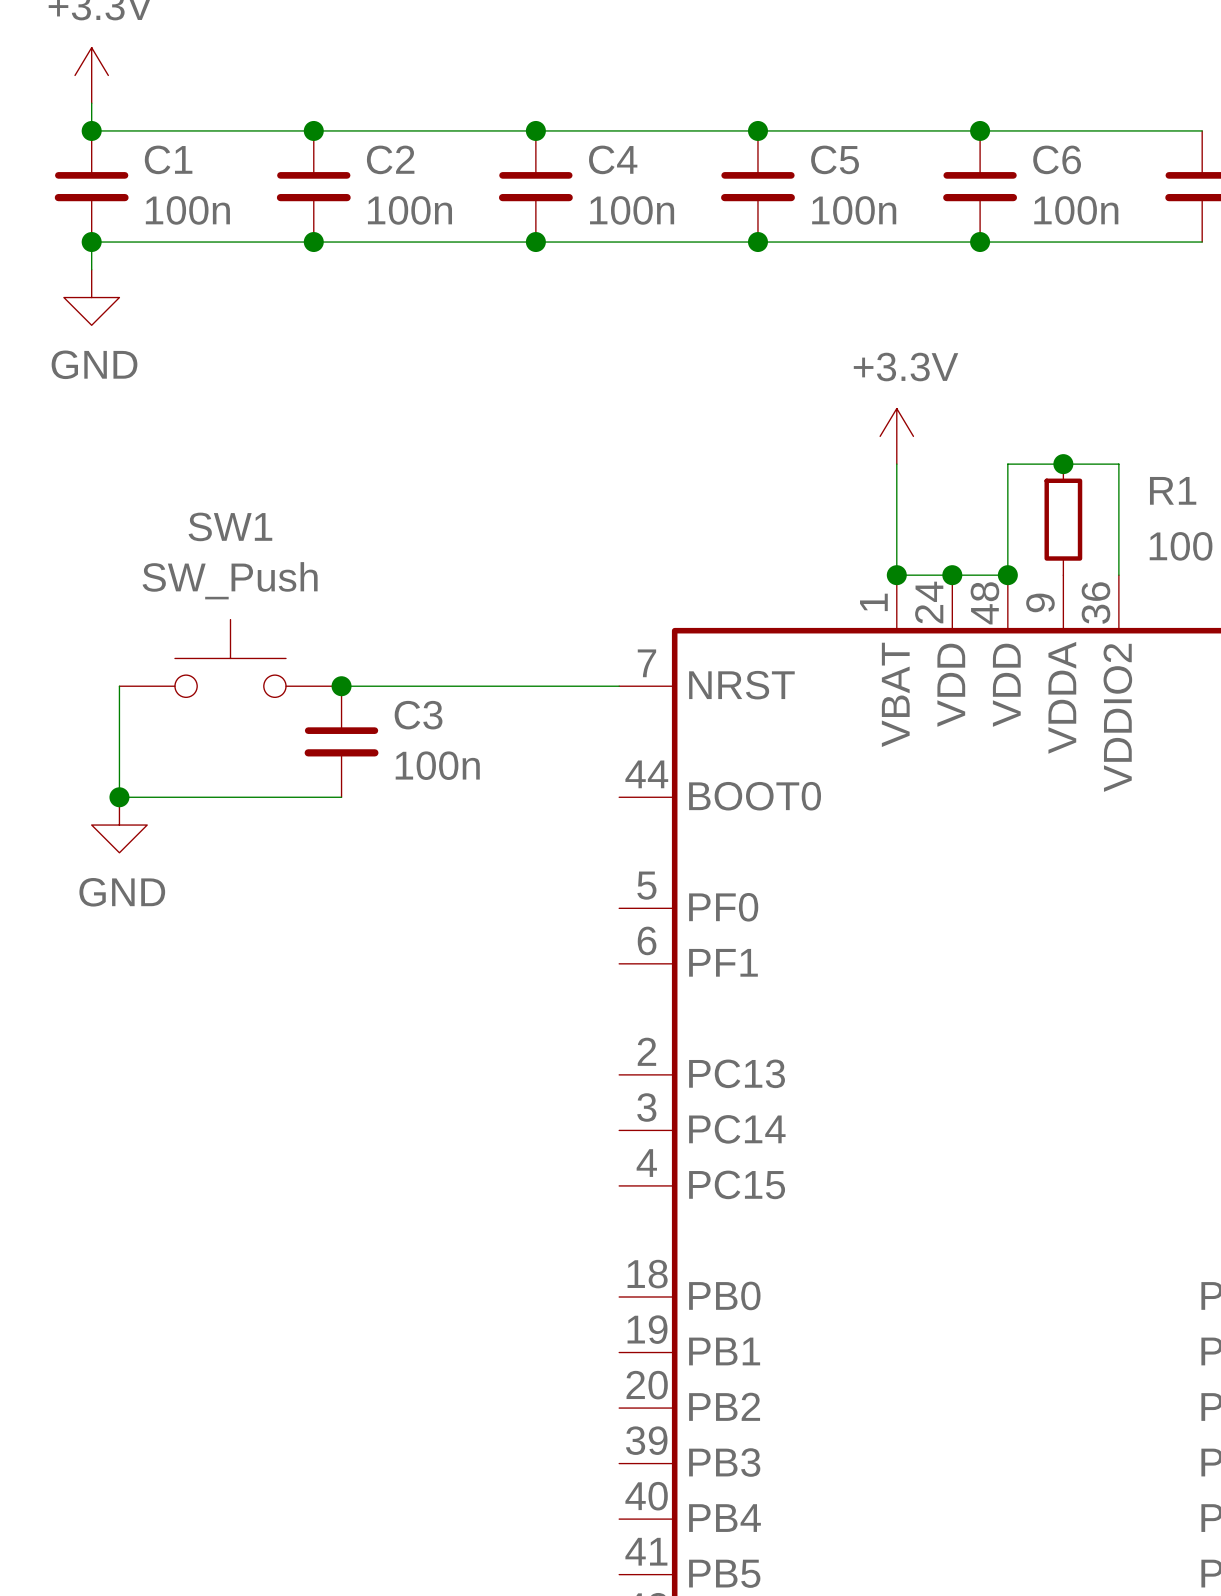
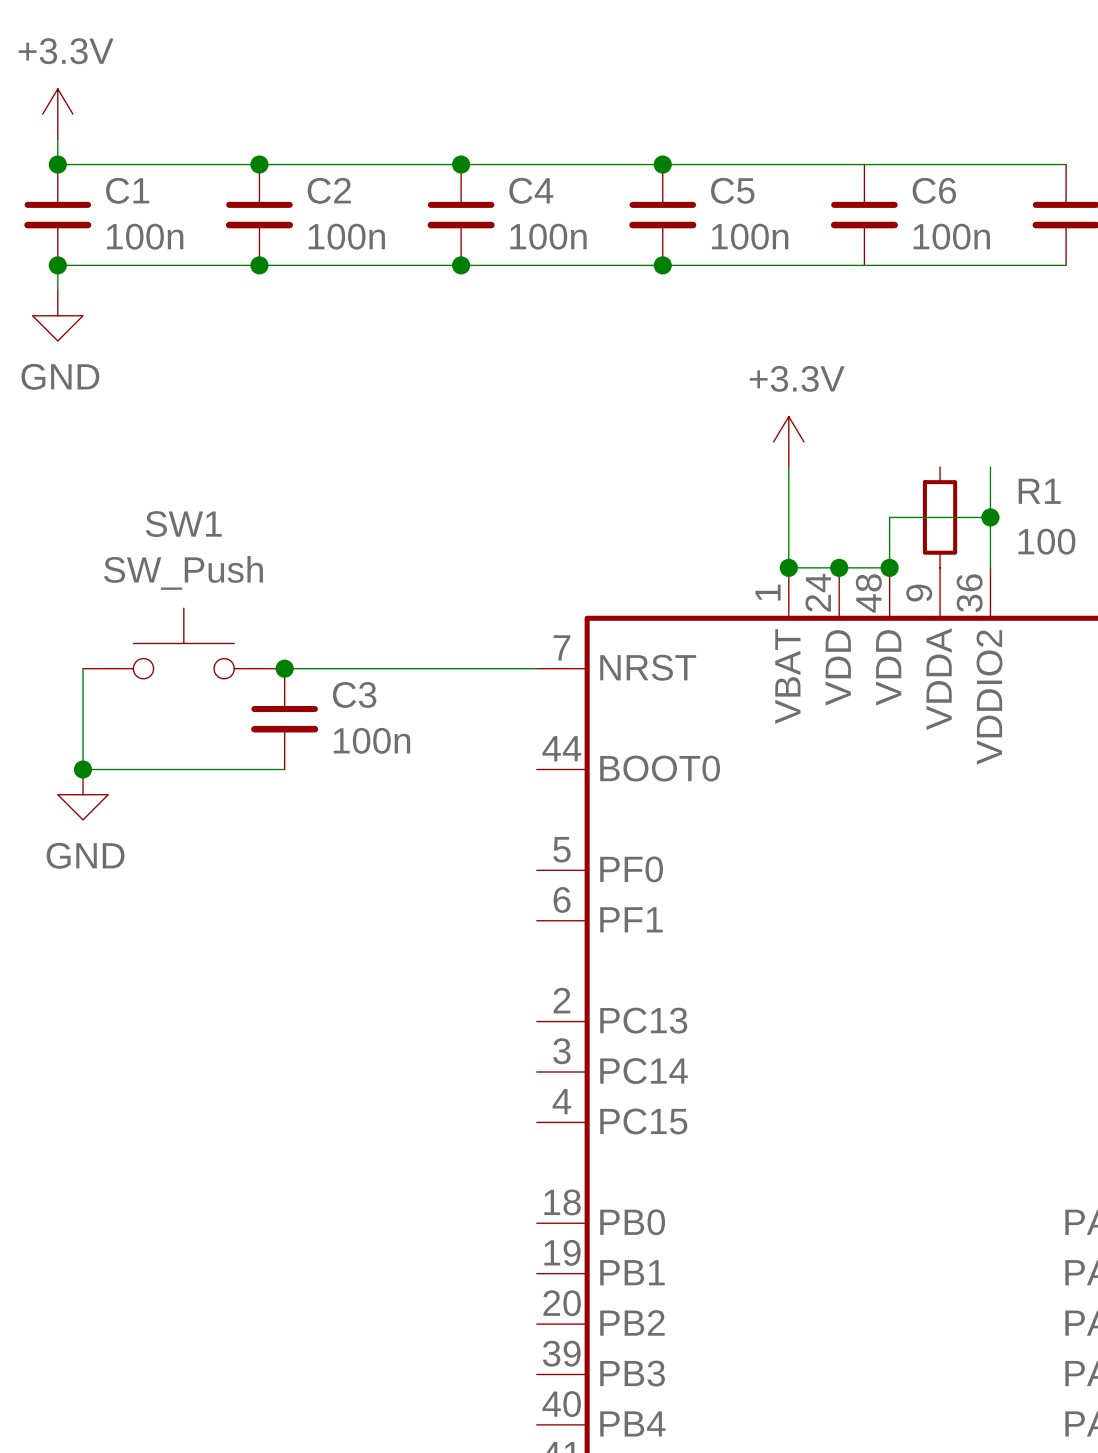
junction: (980, 130) -> none
junction: (980, 242) -> none
junction position: (1063, 464) -> (990, 517)
wire: (1118, 464) (1007, 464) (1007, 519) -> (990, 517) (889, 517)

